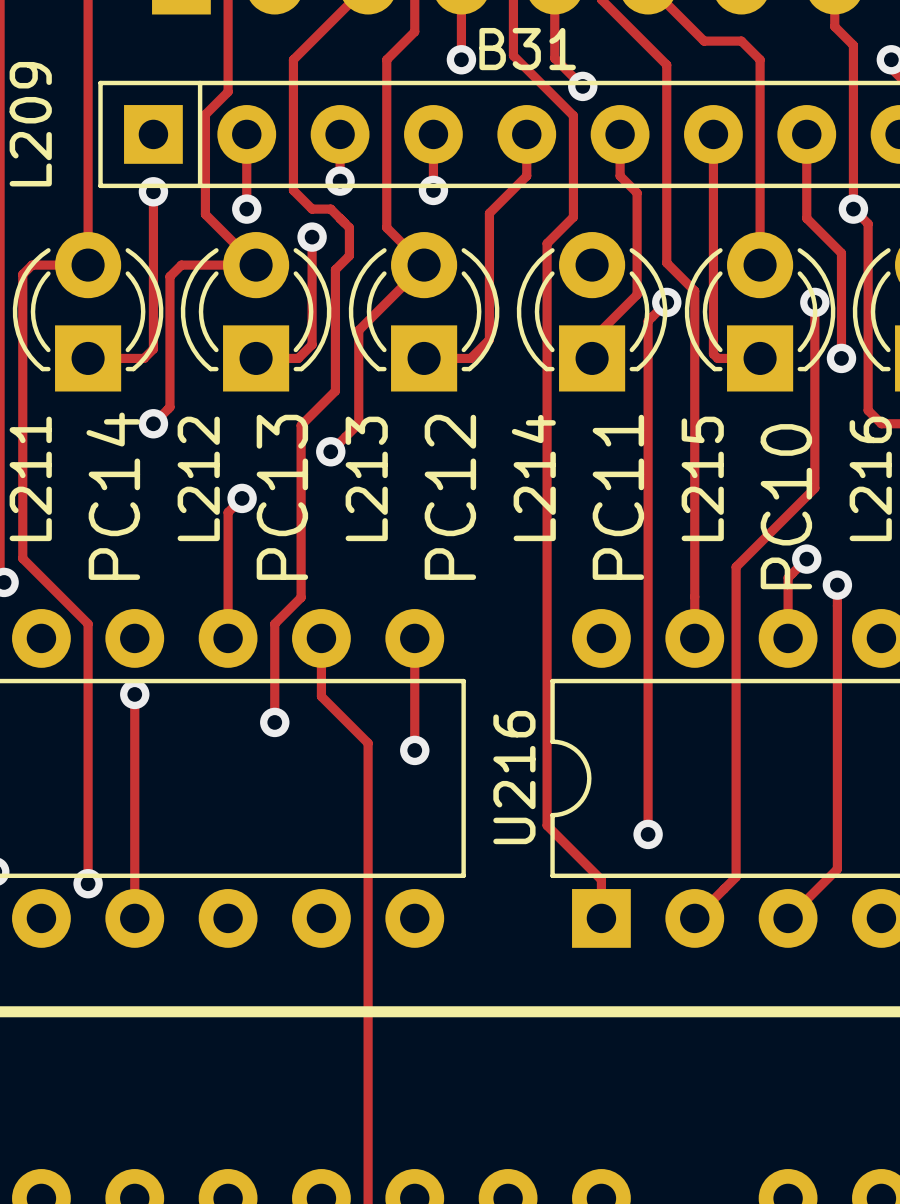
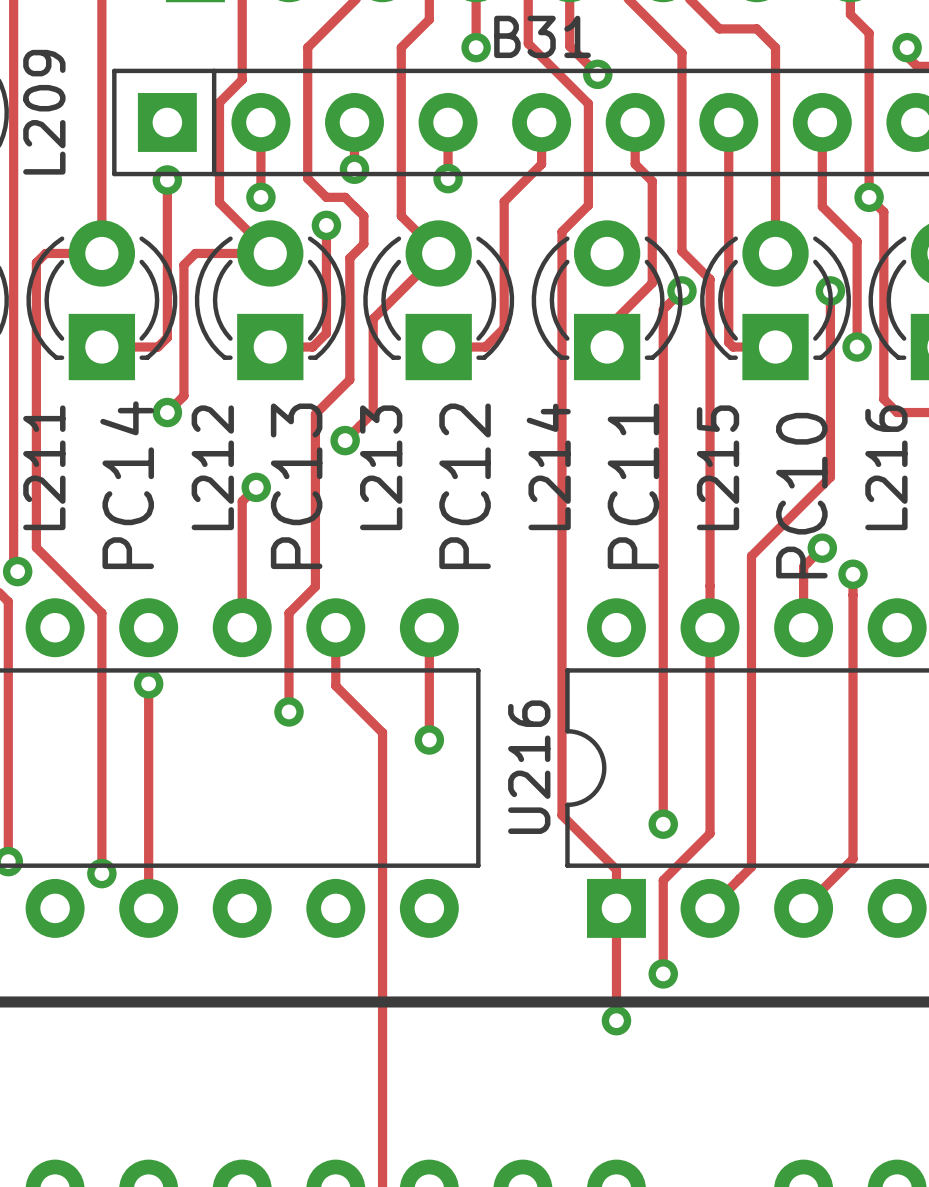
track: none -> (710, 627) (710, 833) (663, 880) (663, 973)
track: none -> (616, 908) (616, 1020)
via: none -> (663, 973)
via: none -> (616, 1020)

